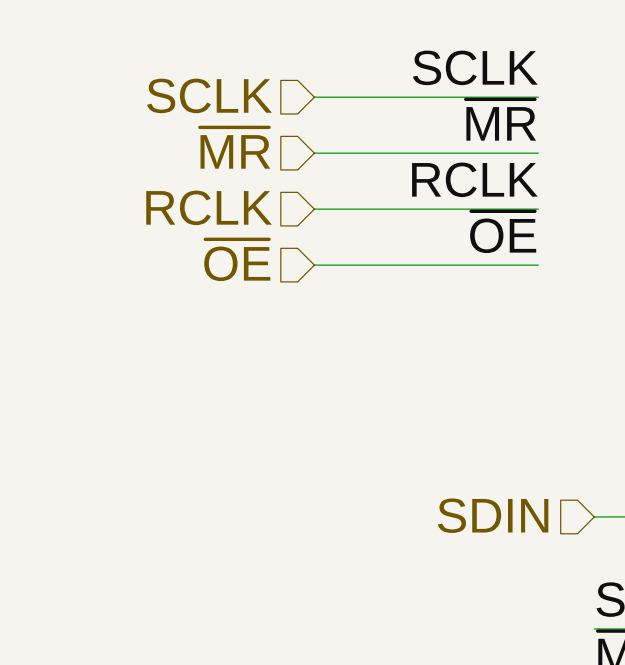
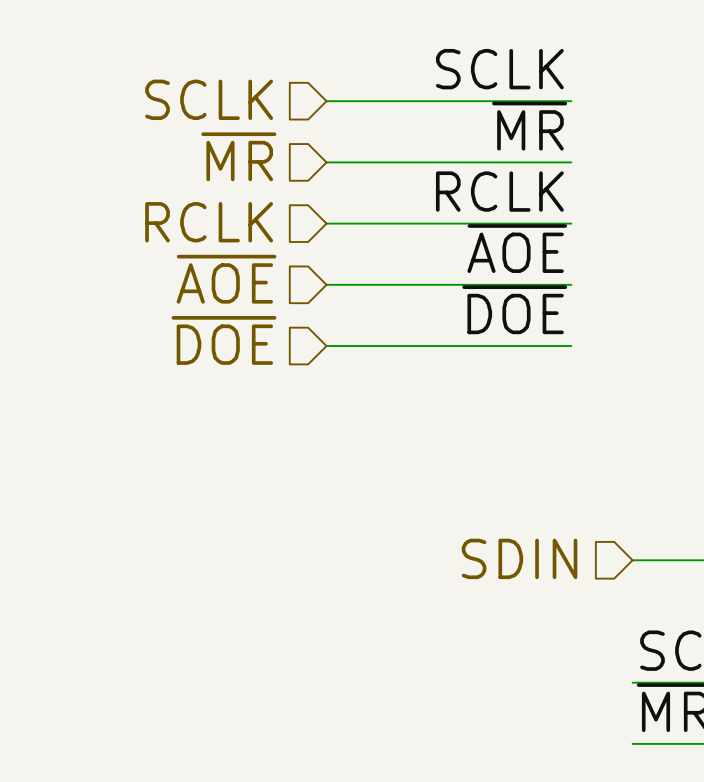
label: ~{OE} (503, 232) -> ~{AOE} (517, 248)
hierarchical label: ~{OE} (237, 260) -> ~{AOE} (226, 279)
label: none -> ~{DOE} (514, 309)
hierarchical label: none -> ~{DOE} (223, 340)
wire: none -> (326, 346) (571, 346)

